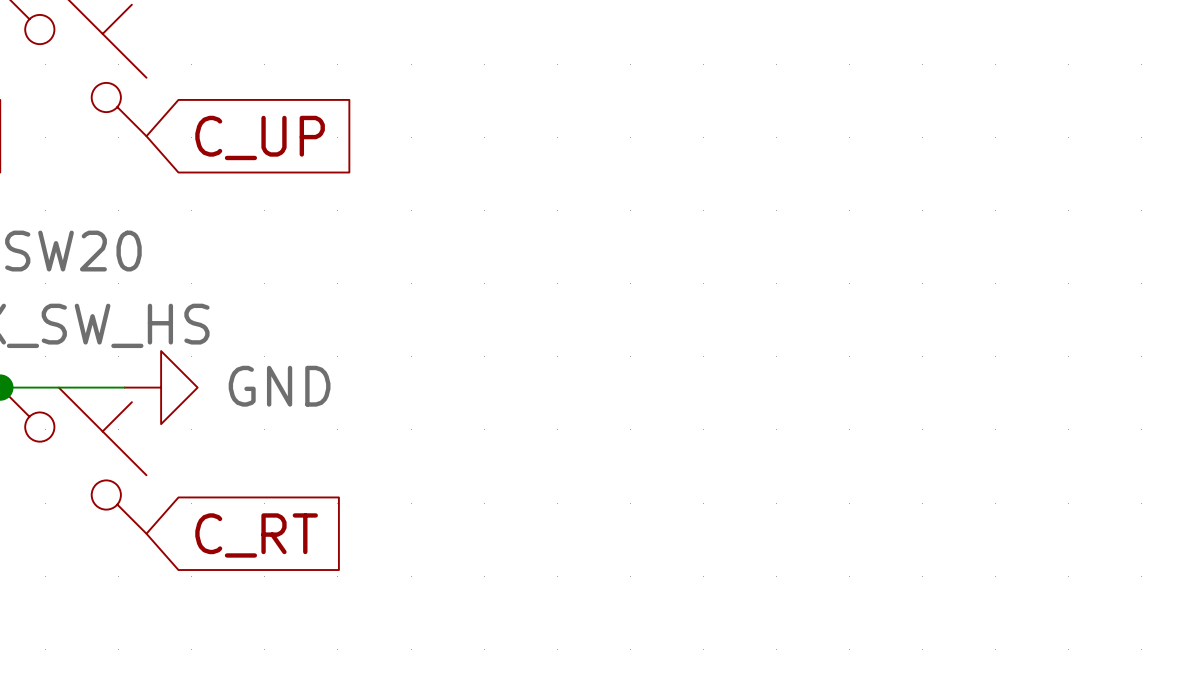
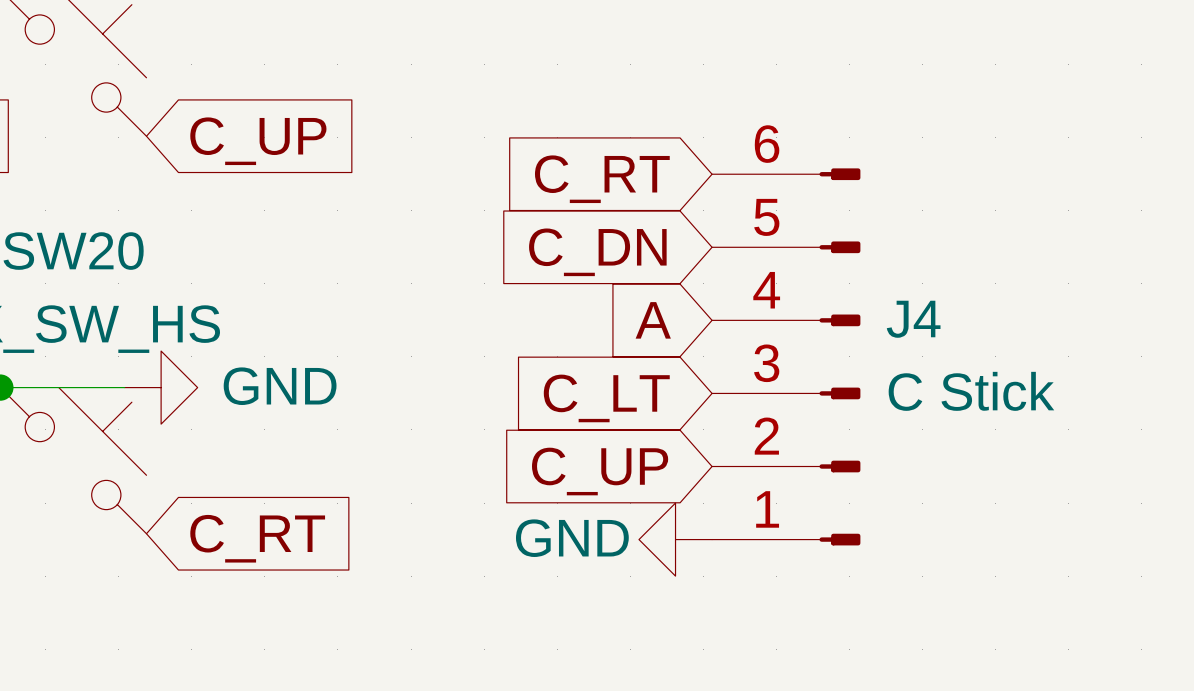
global label: none -> C_RT (602, 179)
global label: none -> C_DN (597, 252)
global label: none -> A (653, 320)
J4: none -> C Stick (786, 356)
global label: none -> C_LT (606, 398)
global label: none -> C_UP (600, 471)
power symbol: none -> GND (675, 539)

